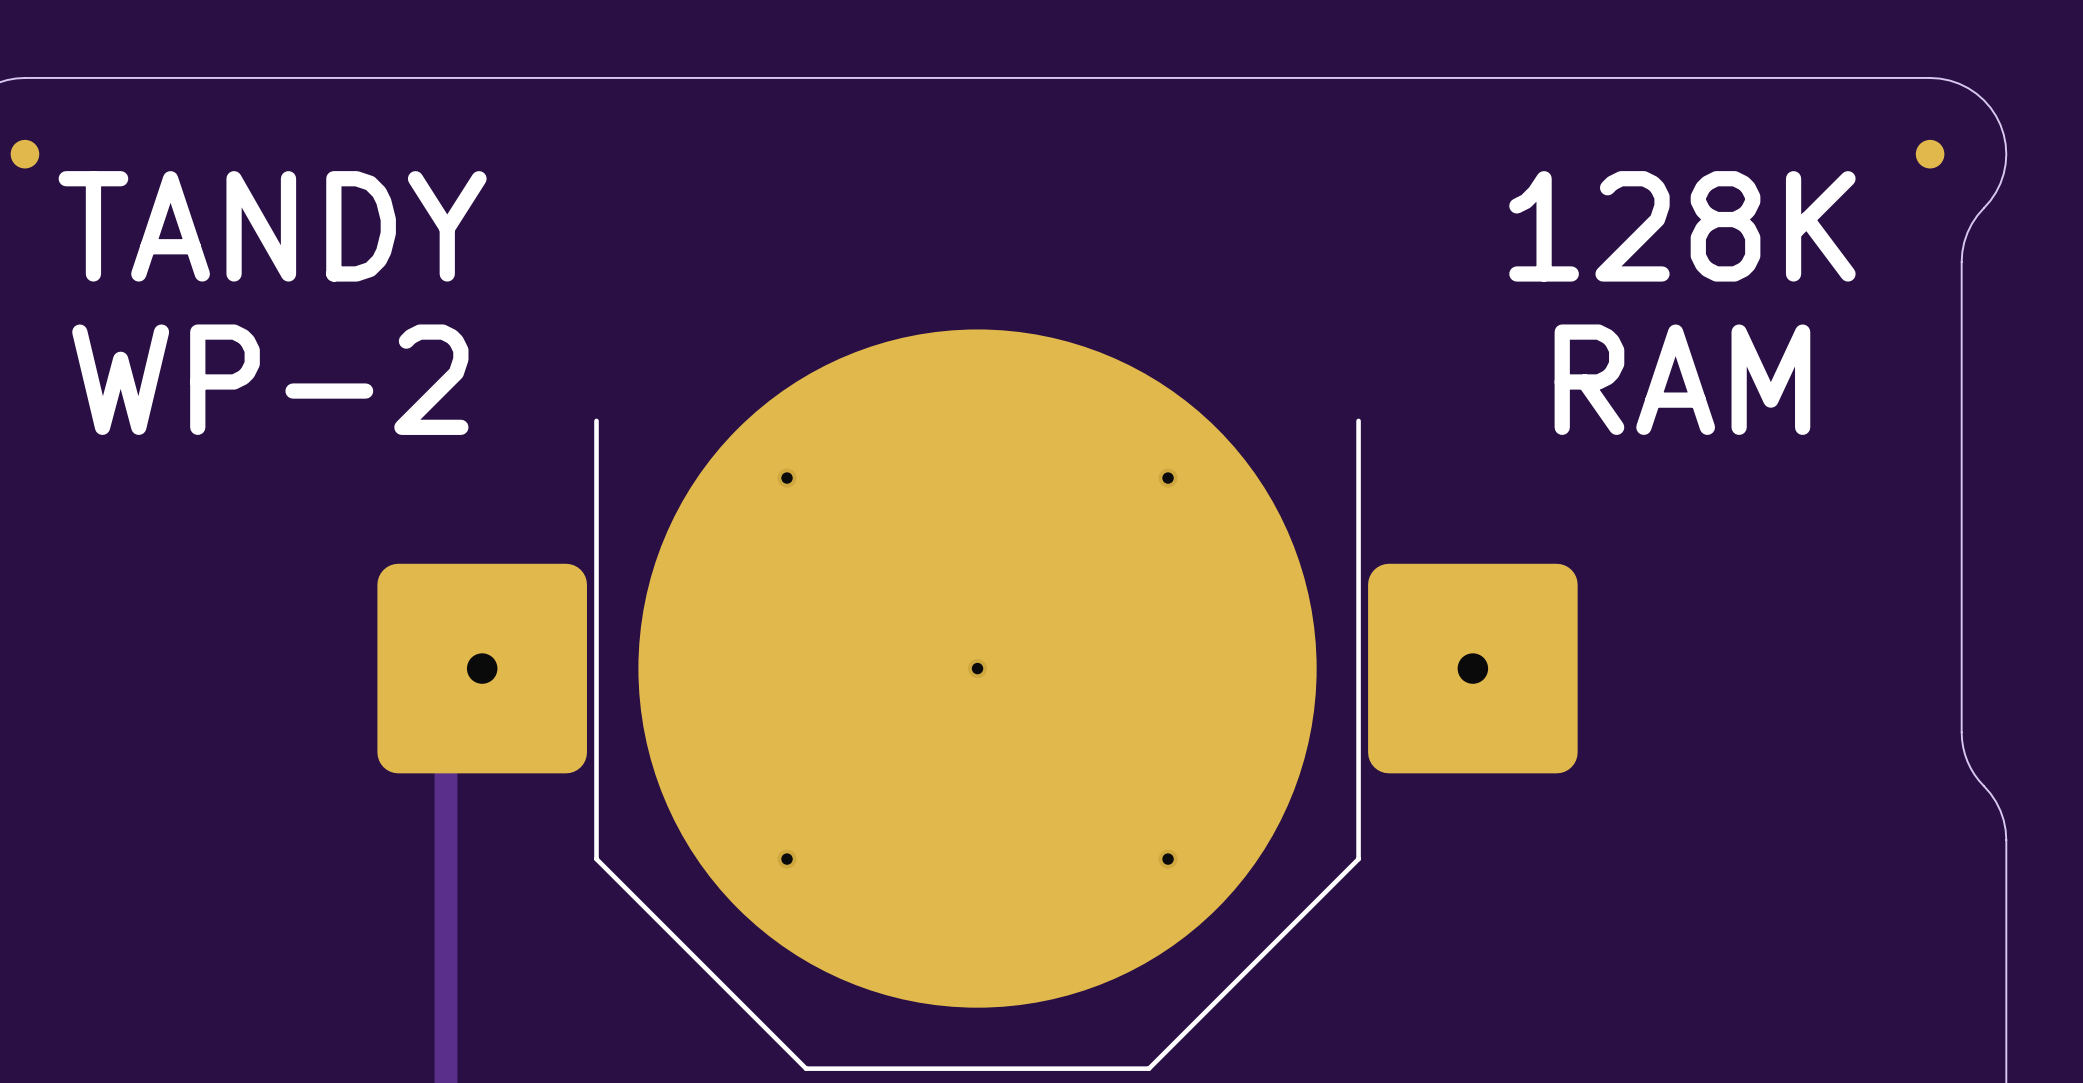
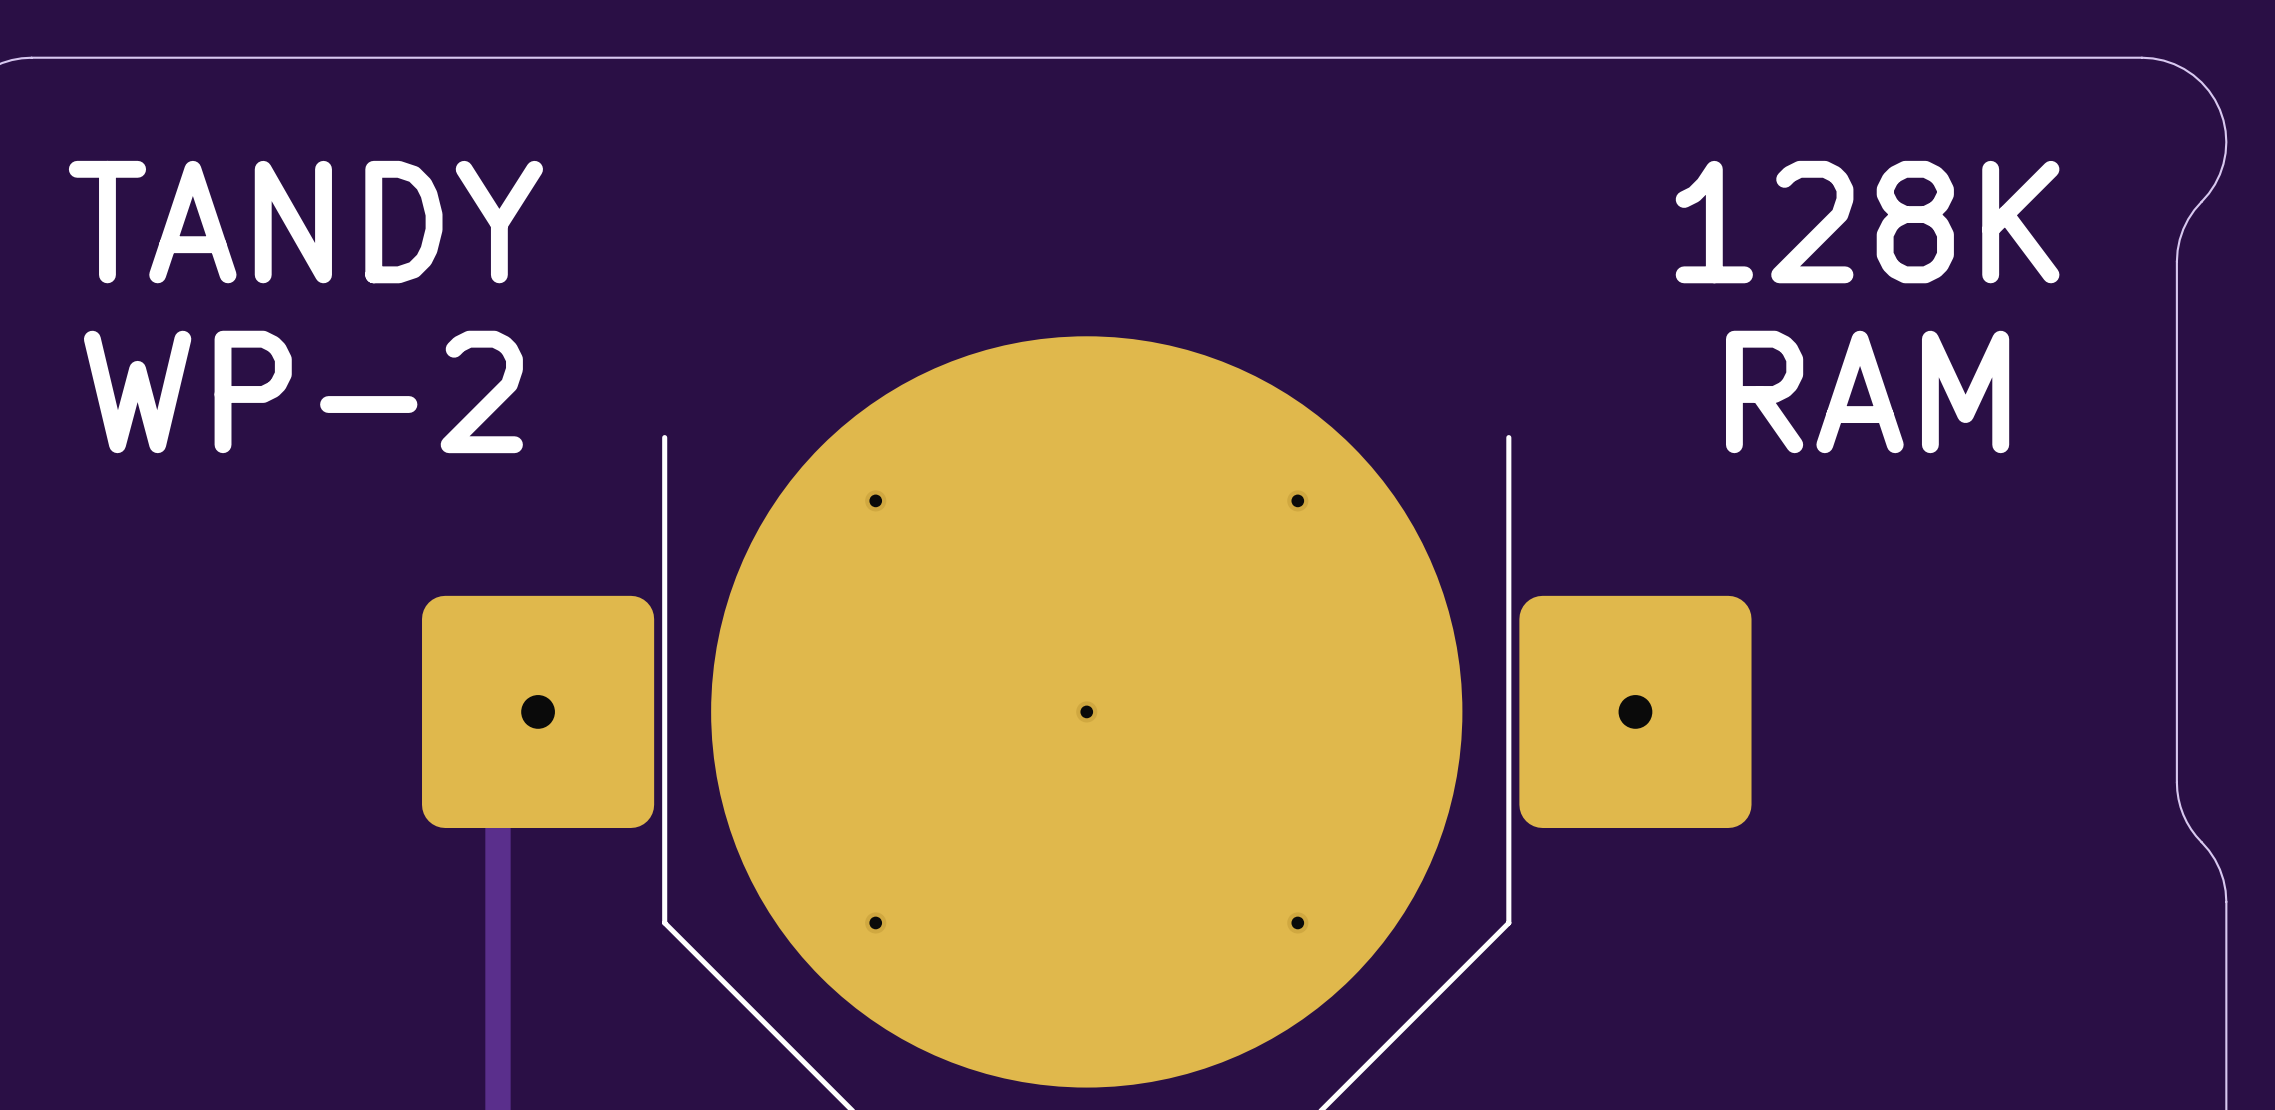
part: (24, 154) -> none
part: (1930, 154) -> none

